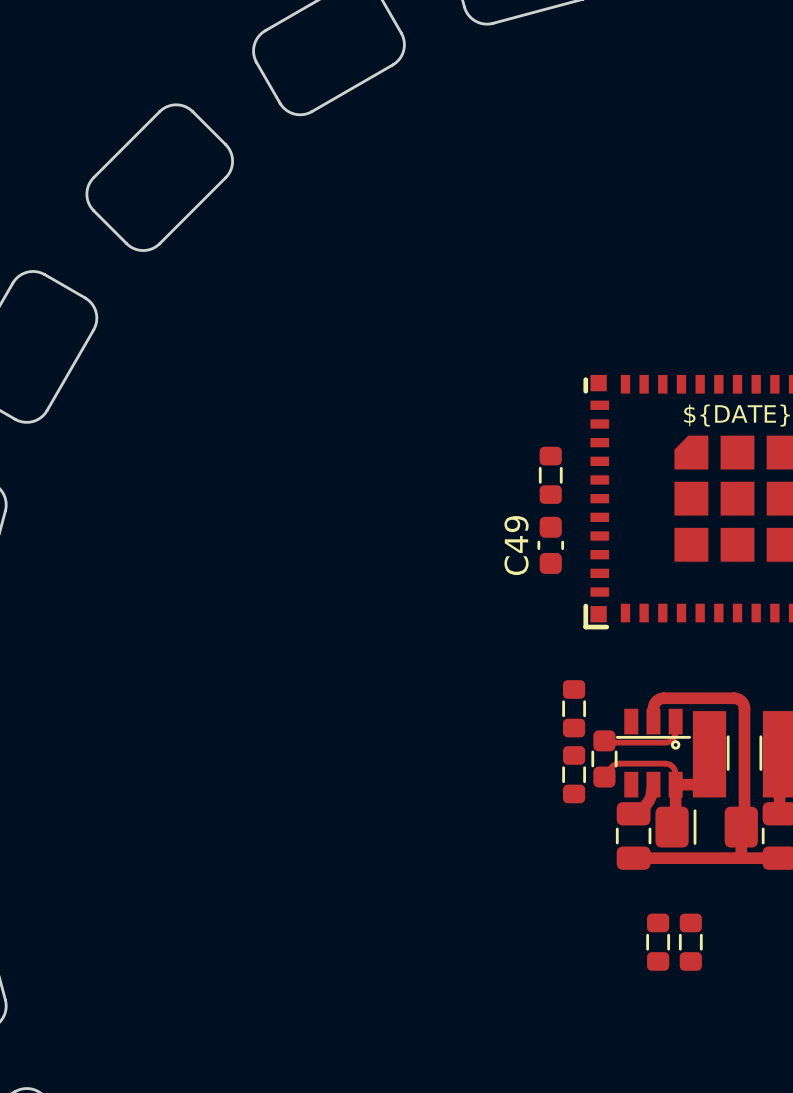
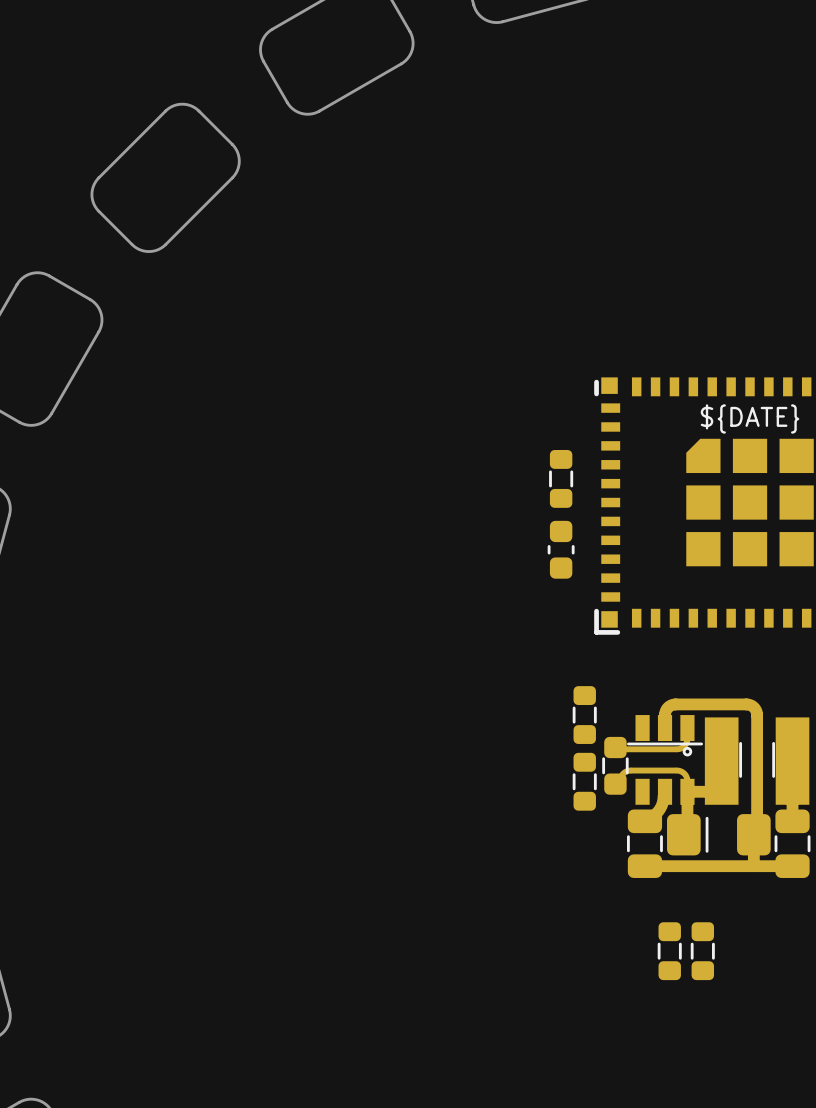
C49 name: C49 (516, 545) -> none

